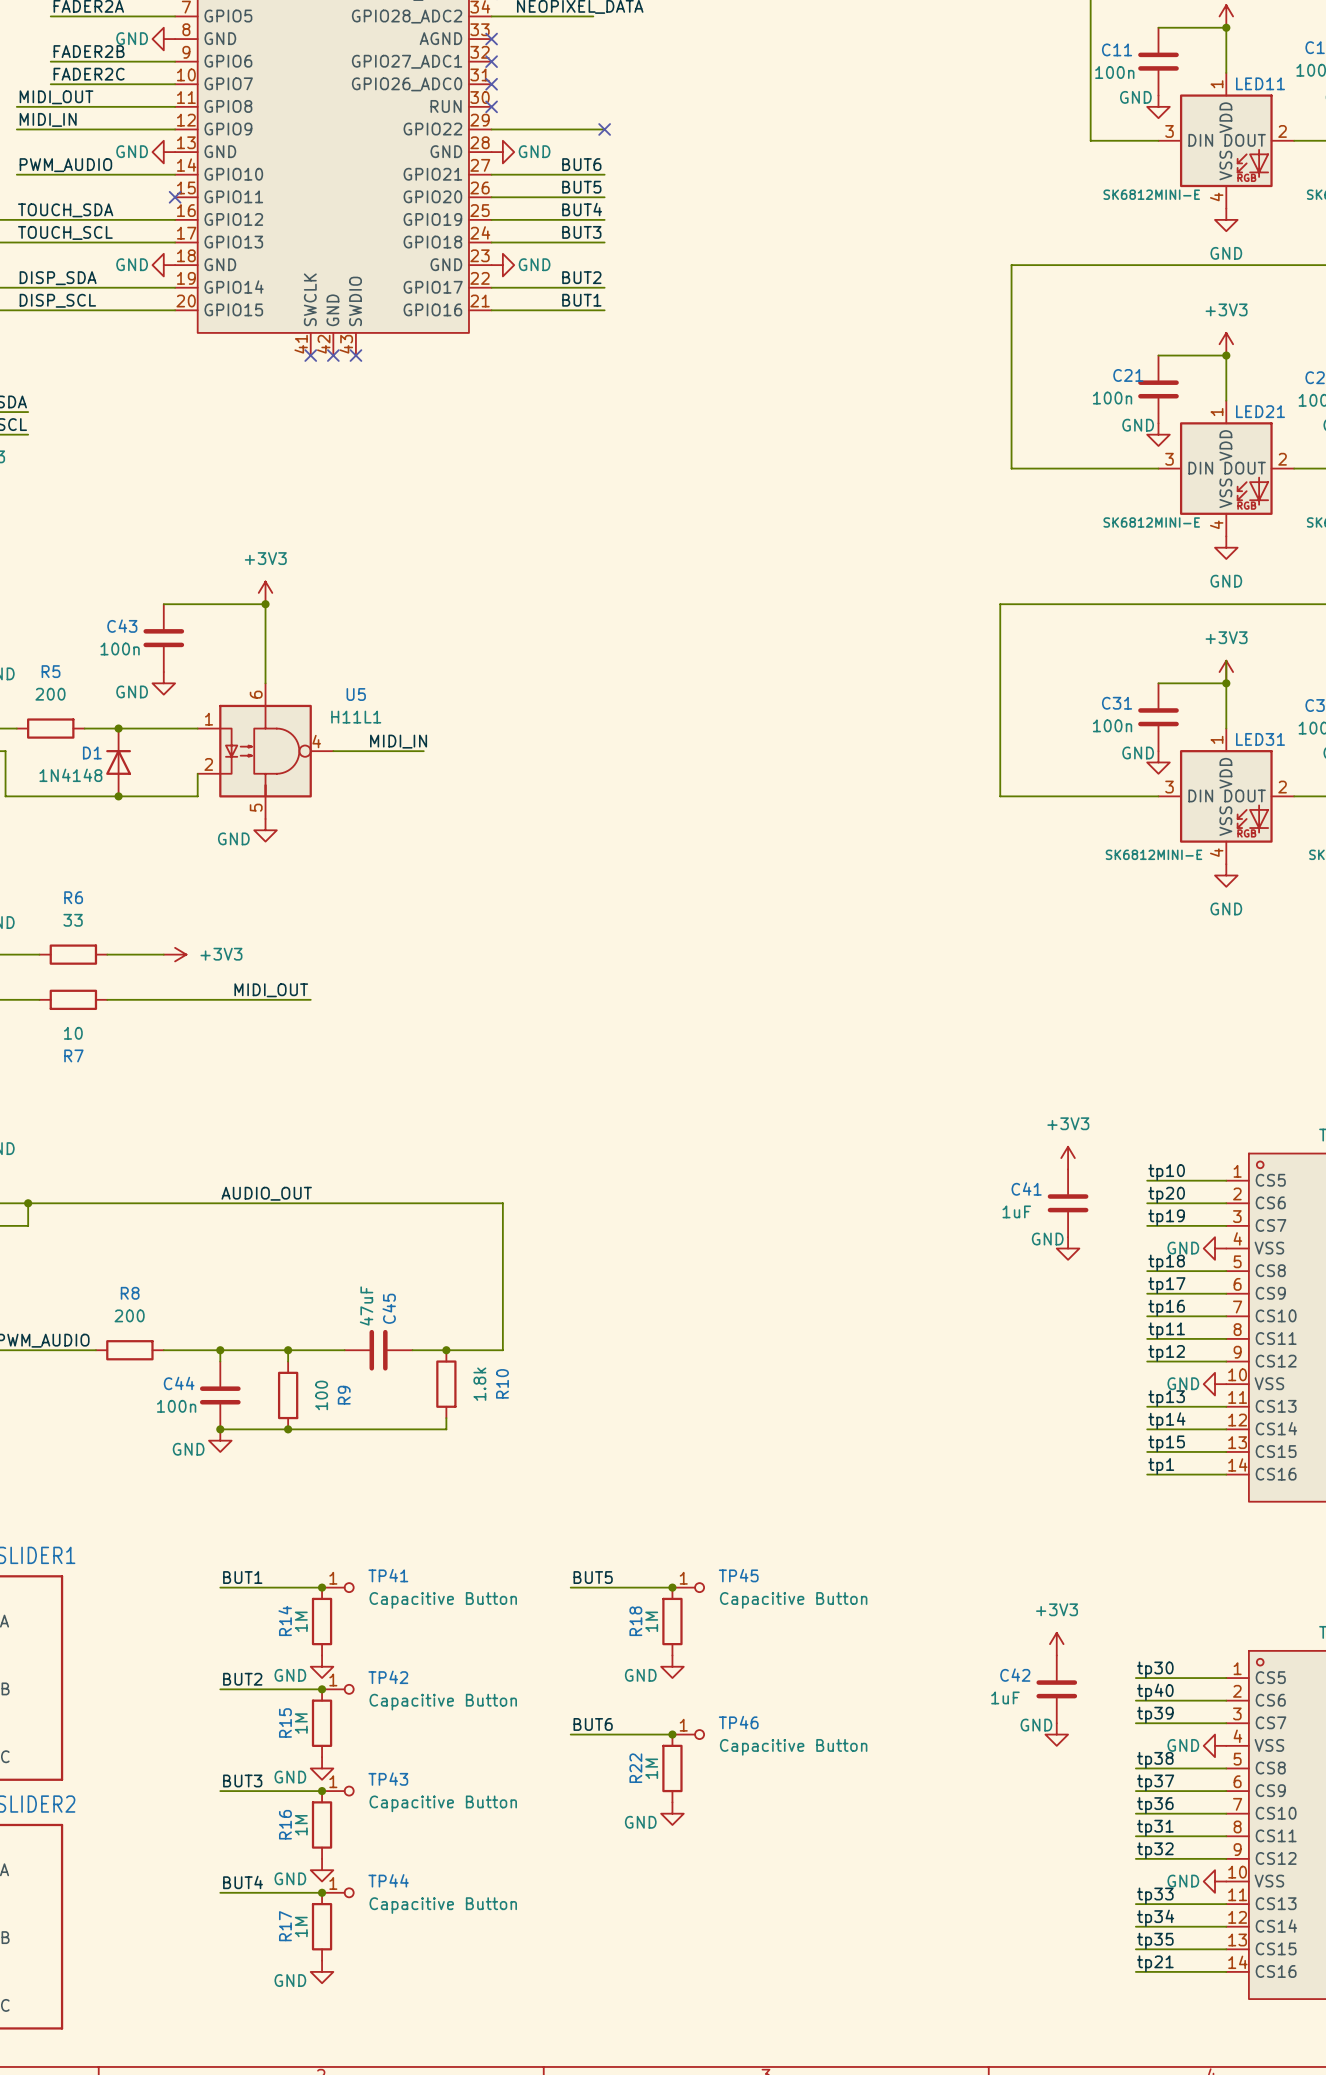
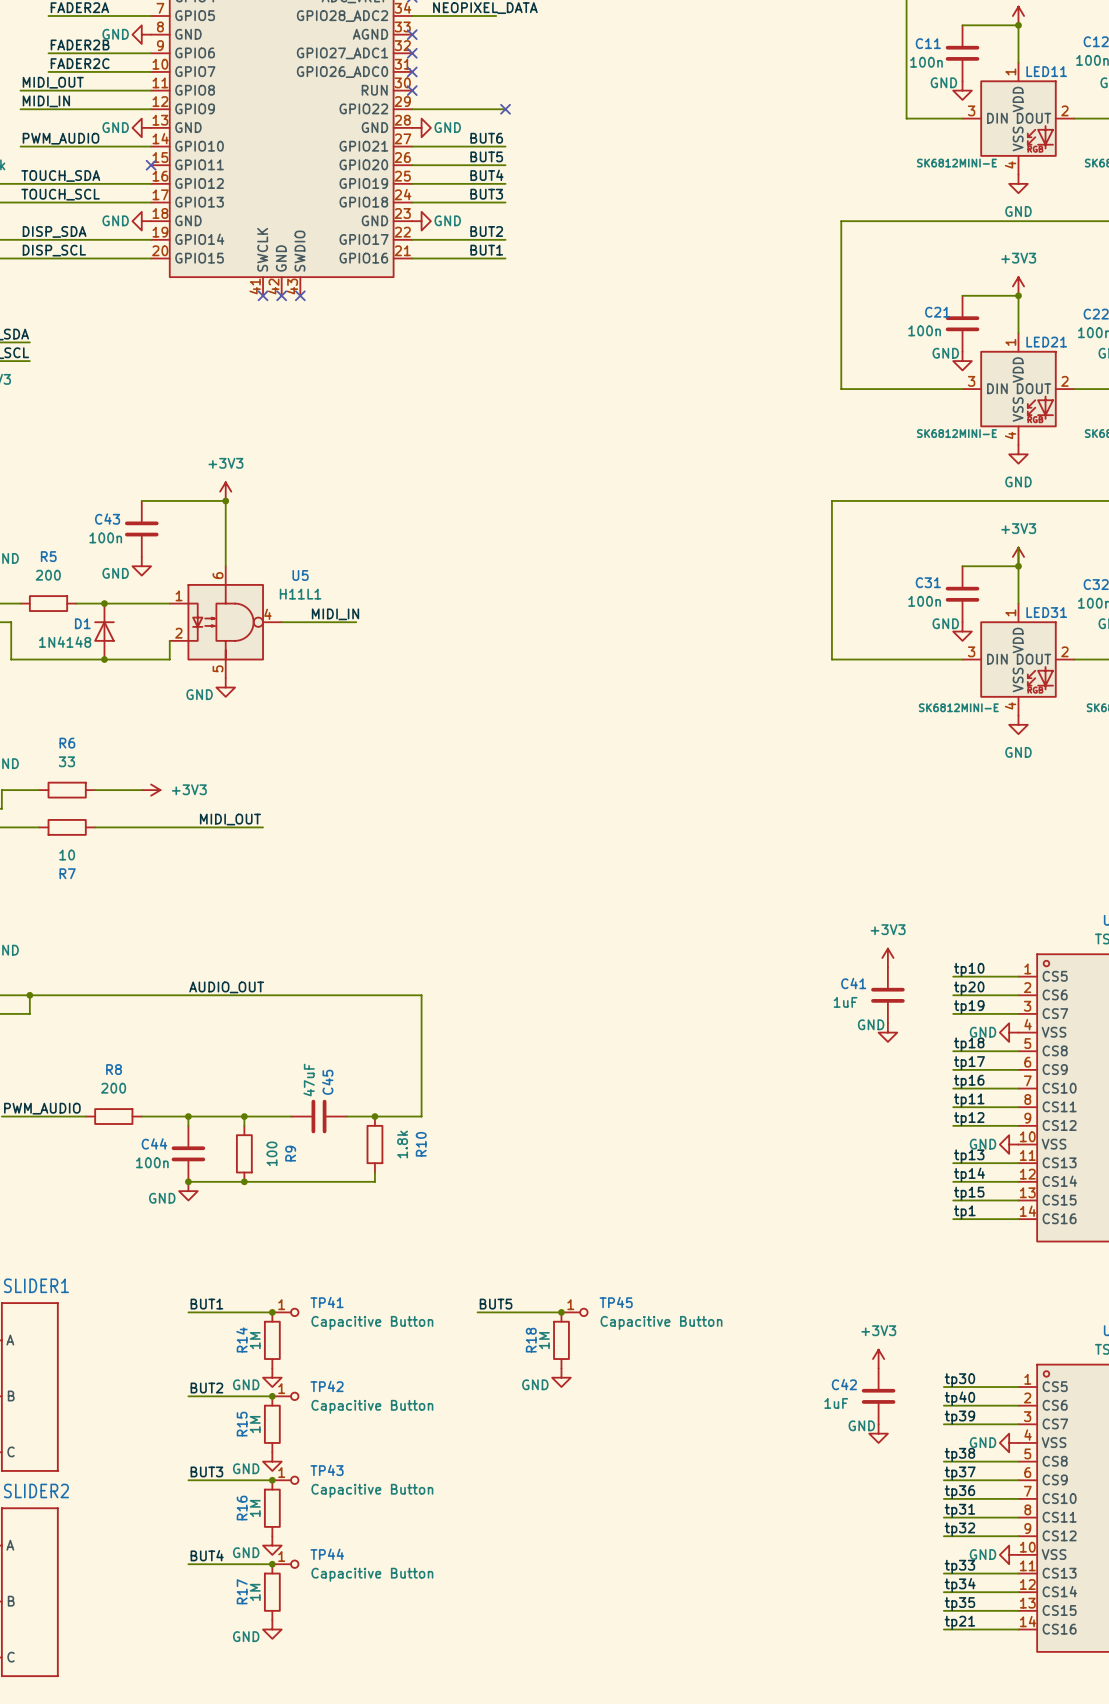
label: BUT6 (593, 1724) -> none
wire: (570, 1734) (672, 1734) -> none
junction: (672, 1734) -> none
TP46: Capacitive Button (688, 1734) -> none
R22: 1M (672, 1768) -> none
power symbol: GND (672, 1813) -> none

